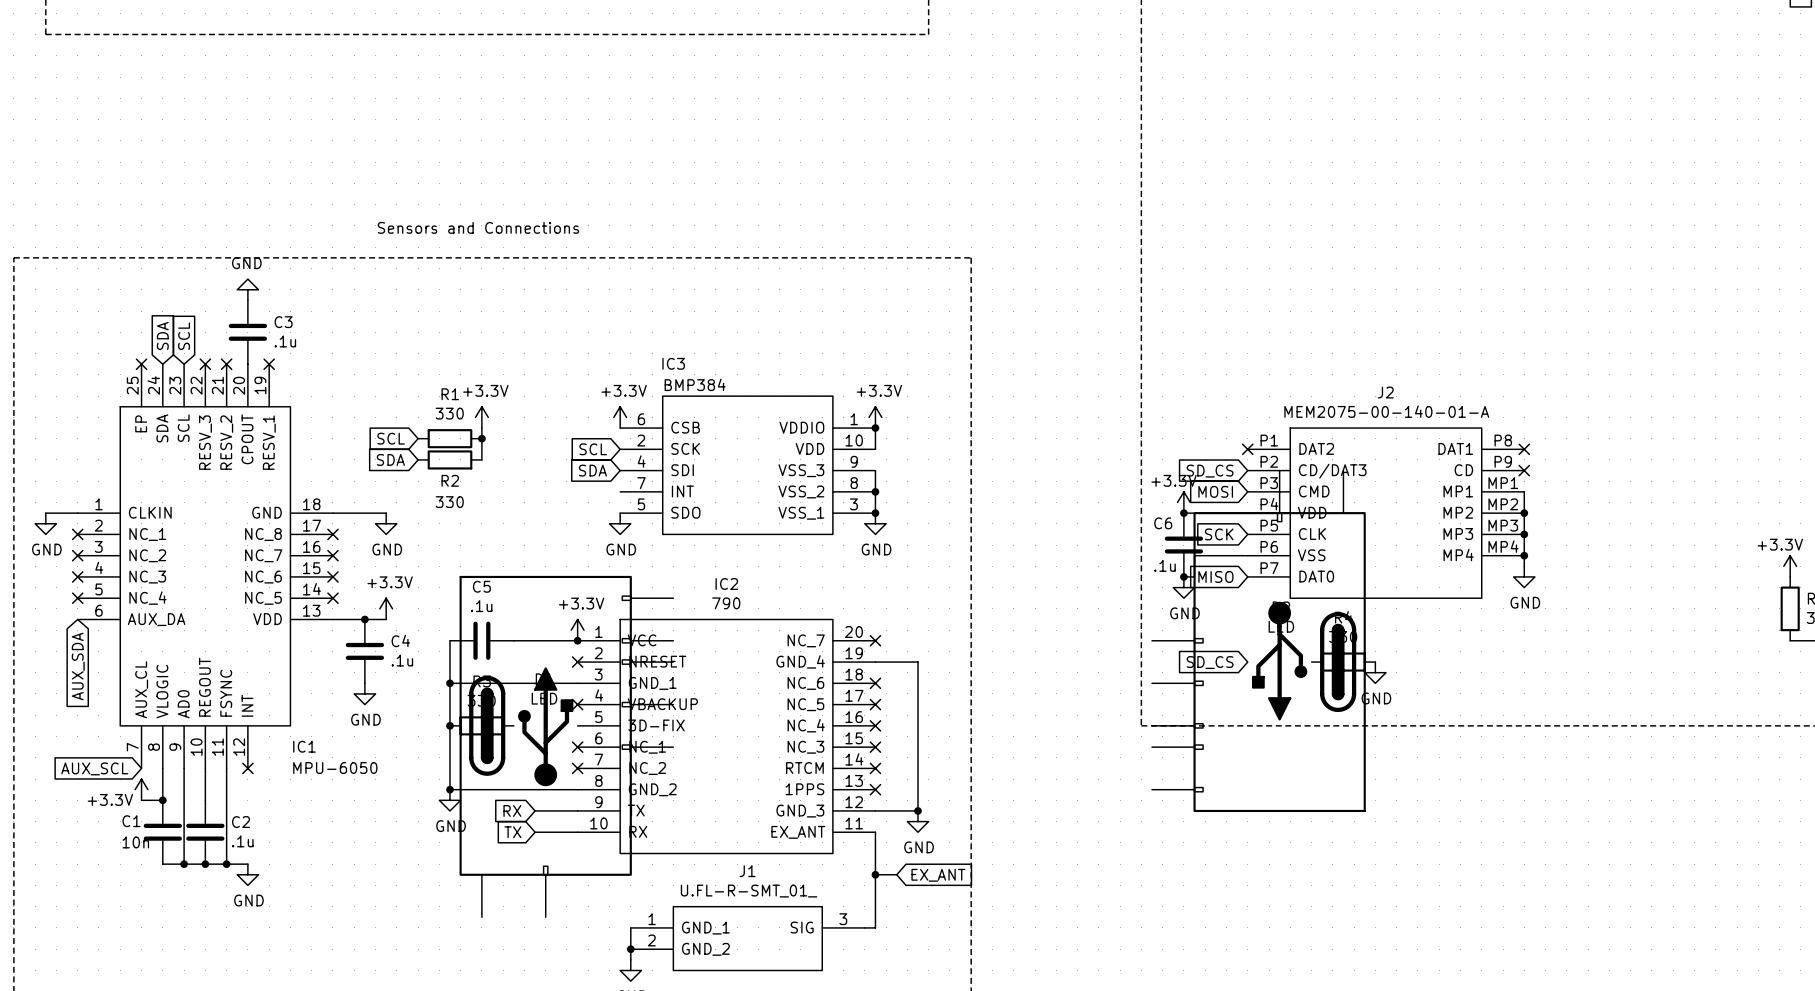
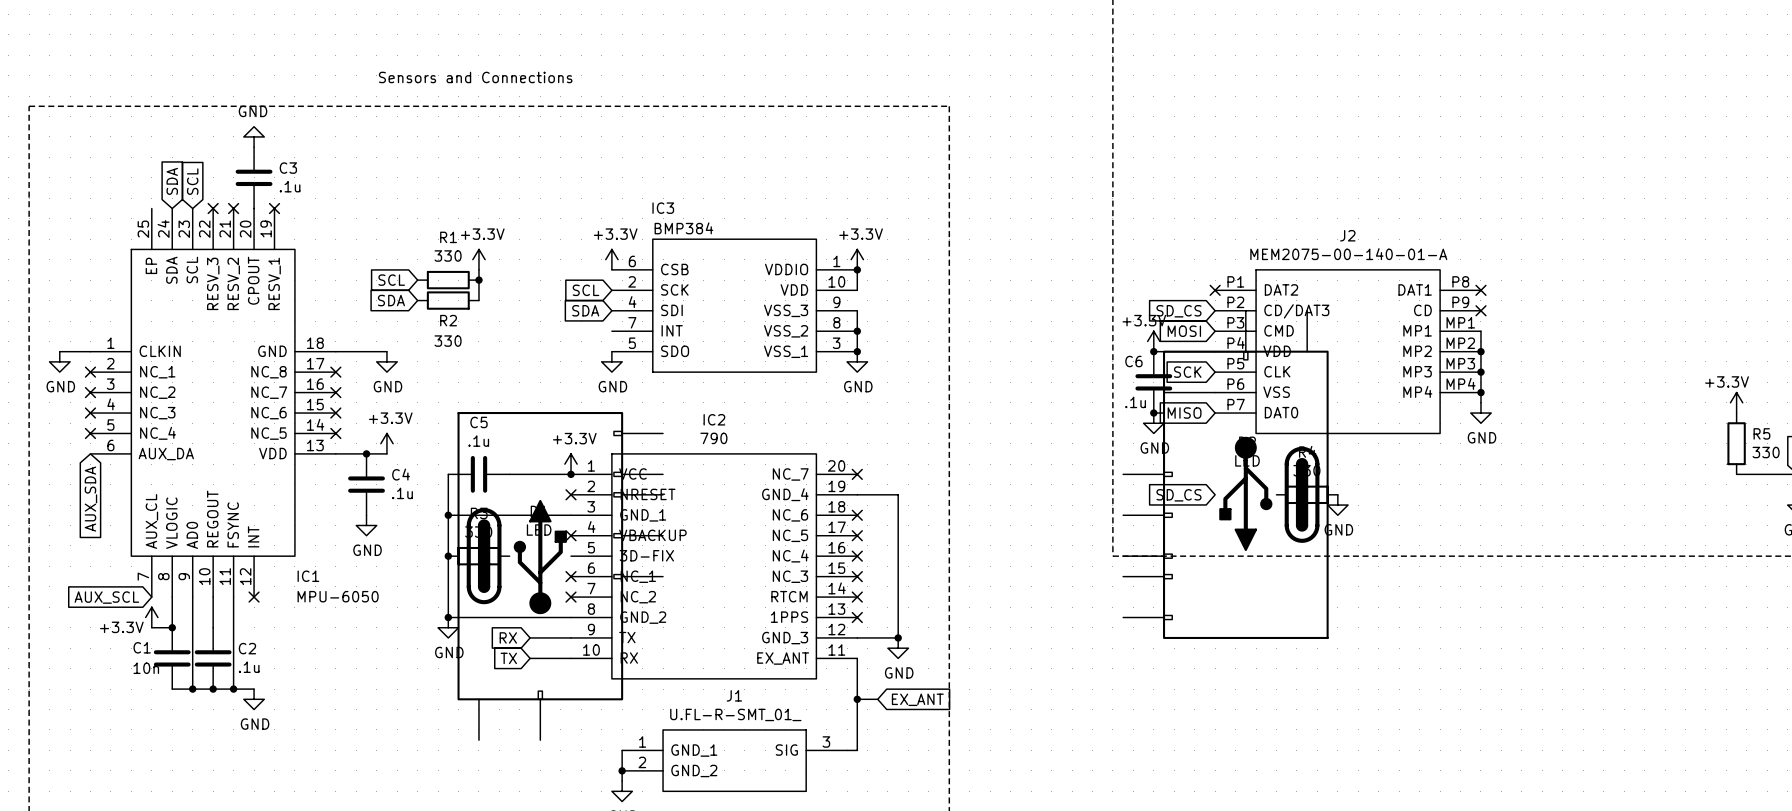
no-connect mark: (141, 364) -> none

